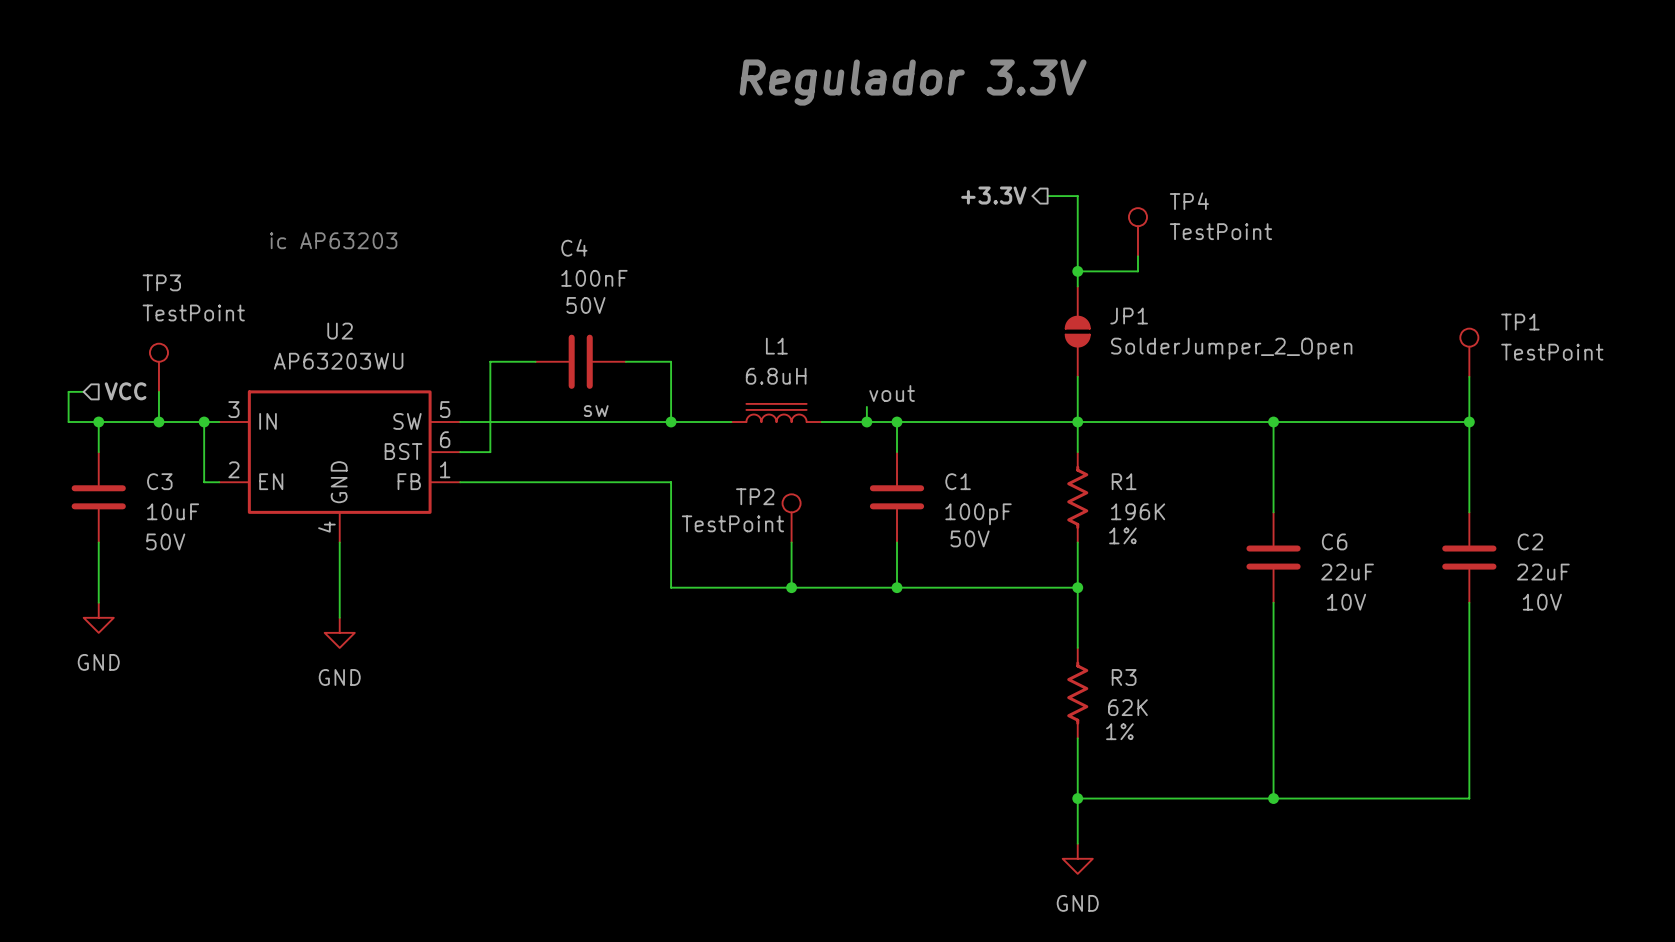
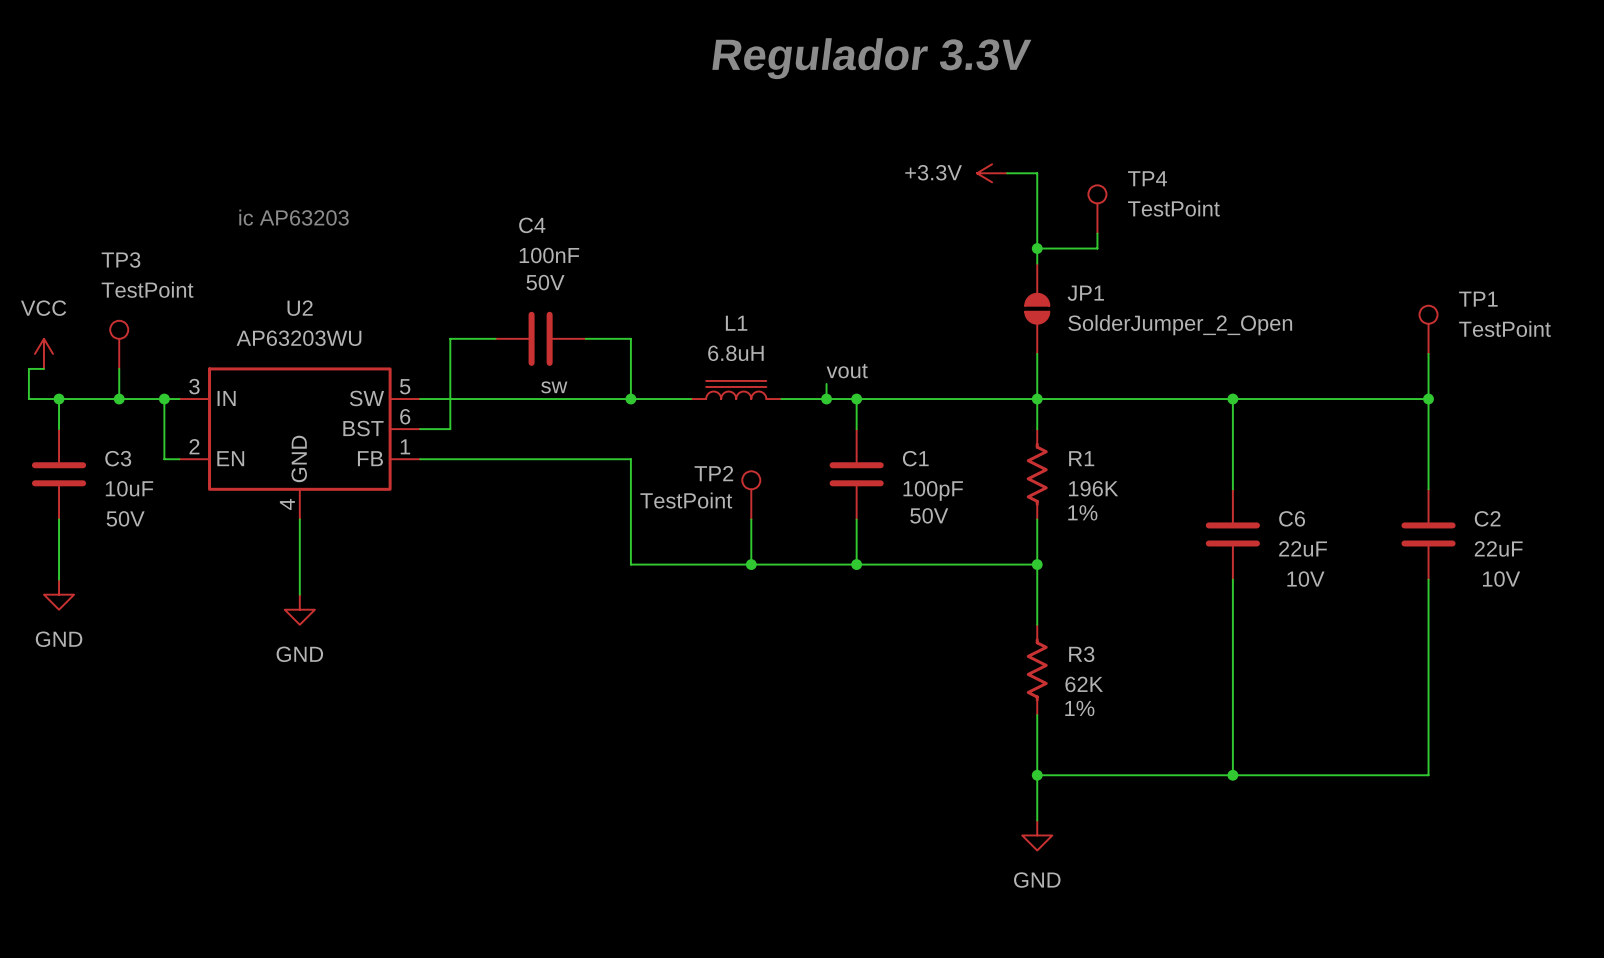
hierarchical label: +3.3V (993, 195) -> none
power symbol: none -> +3.3V (992, 173)
power symbol: none -> VCC (43, 353)
hierarchical label: VCC (125, 391) -> none

